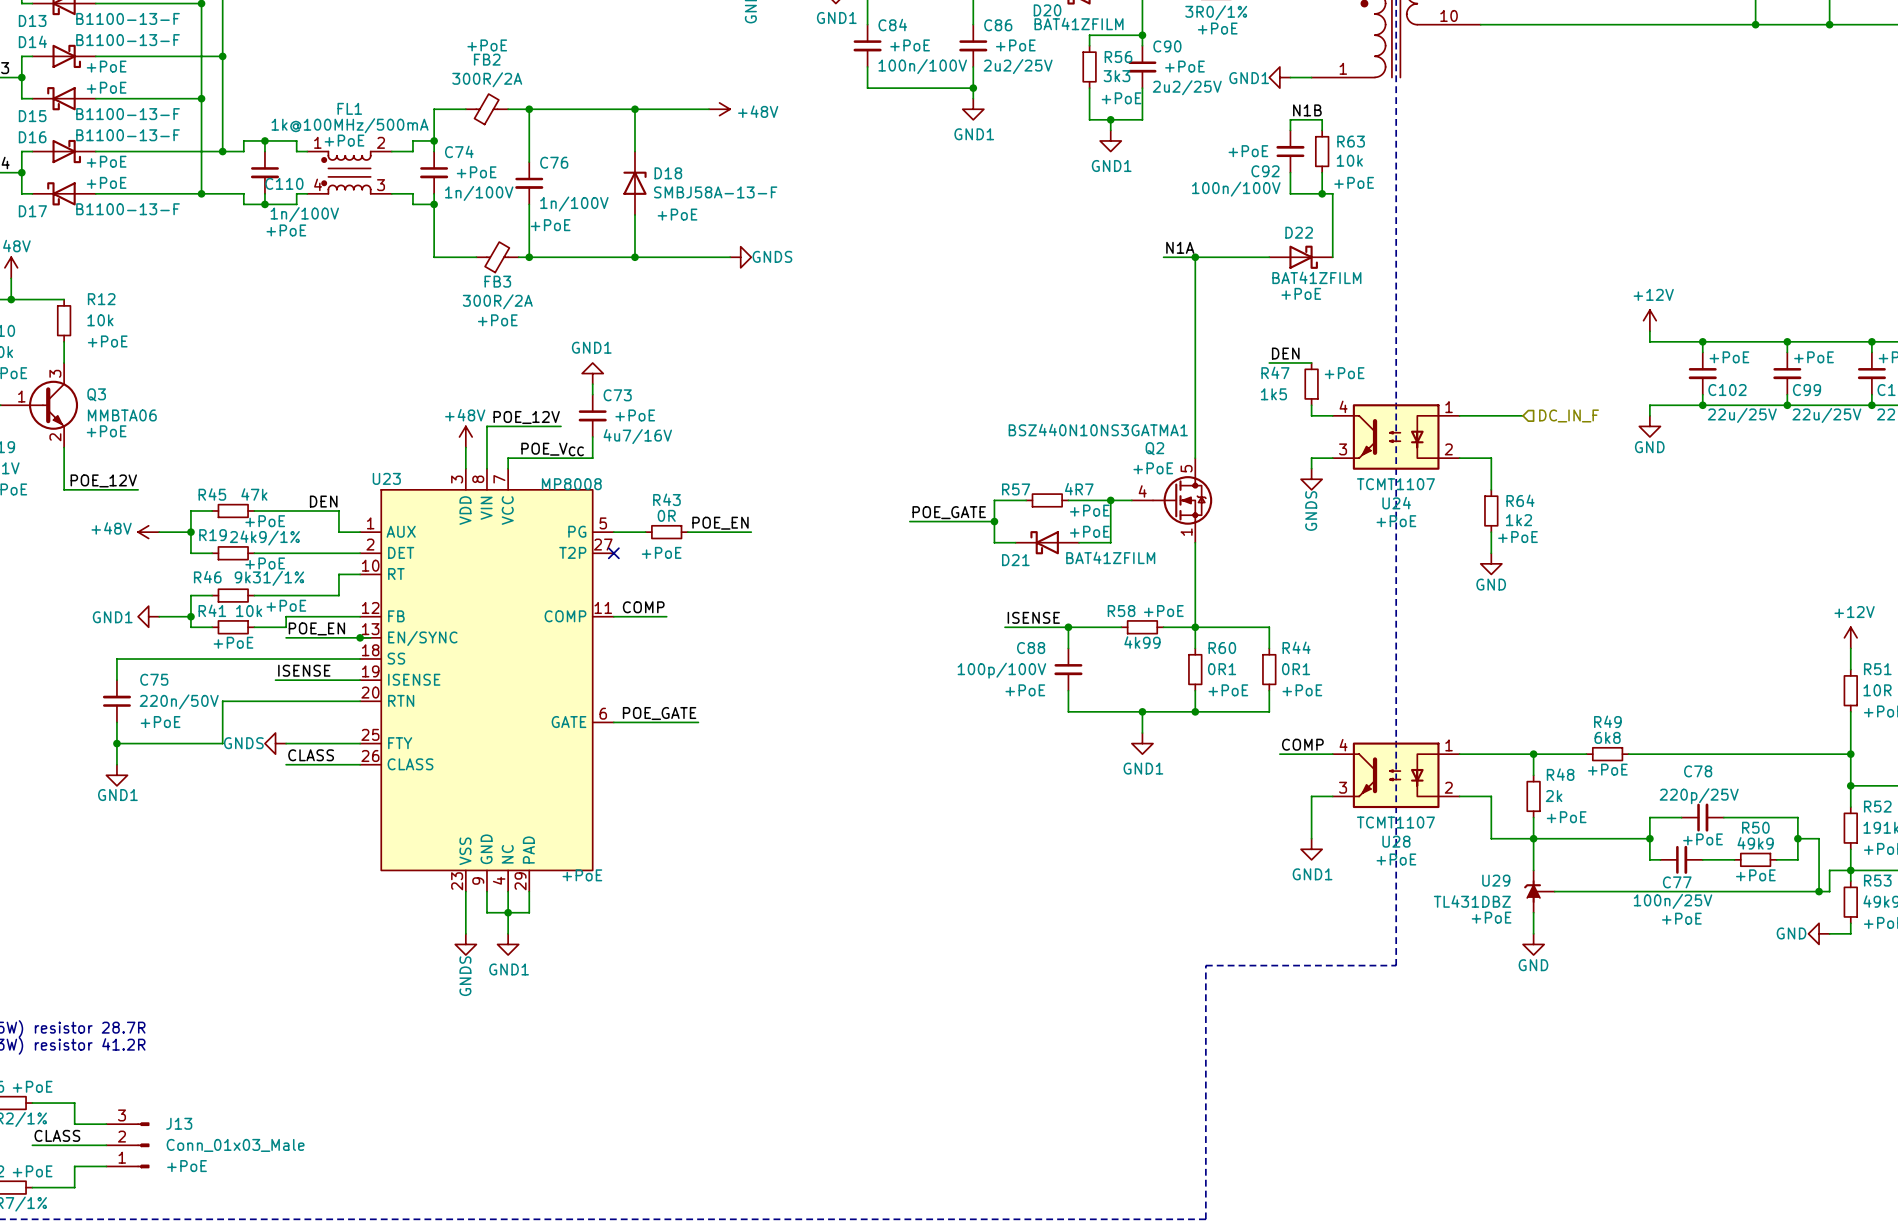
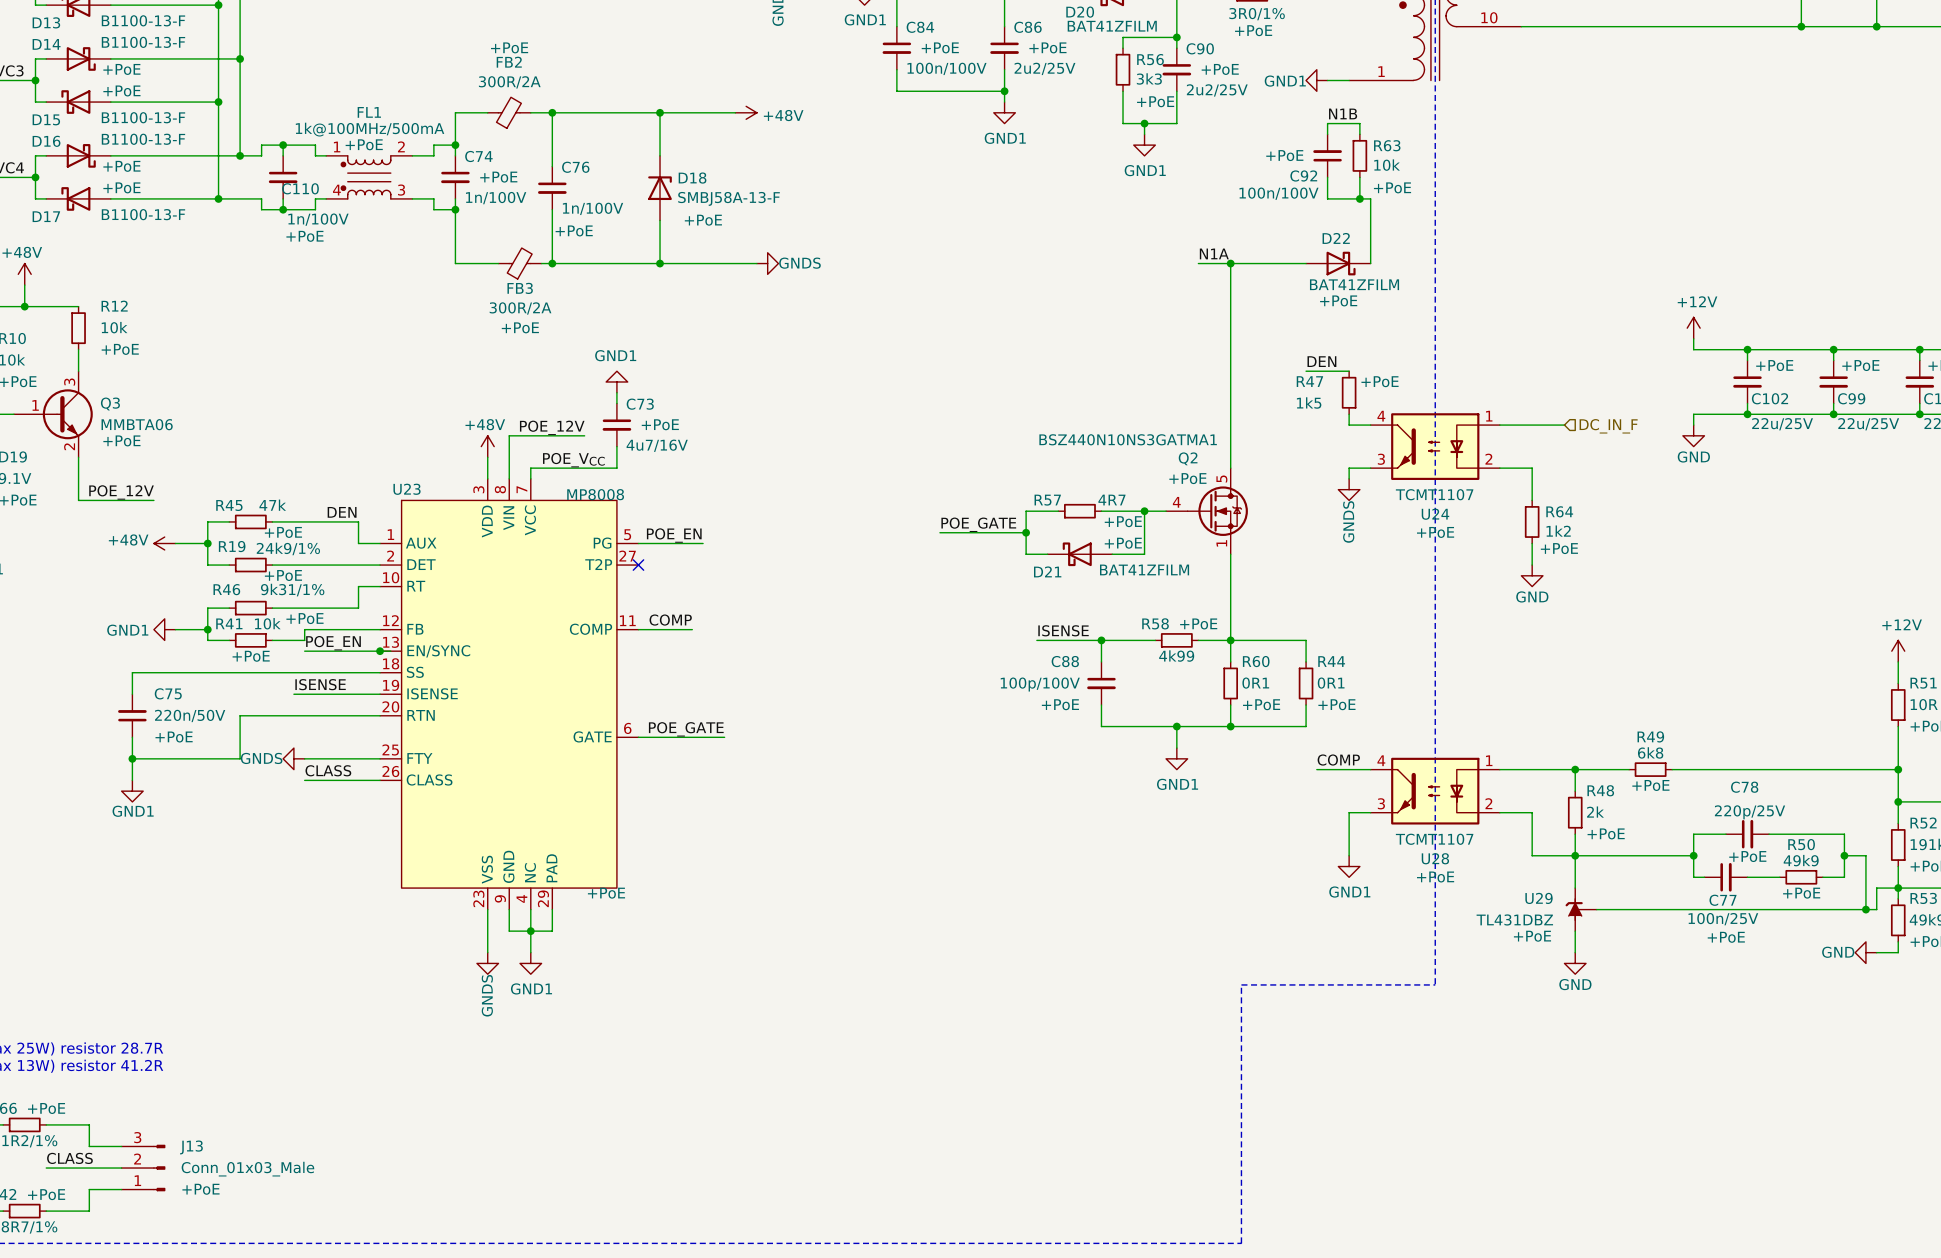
label position: POE_EN (720, 523) -> POE_EN (674, 535)
wire: none -> (670, 543) (703, 543)
R43: 0R (666, 532) -> none
wire: (687, 532) (751, 532) -> none

